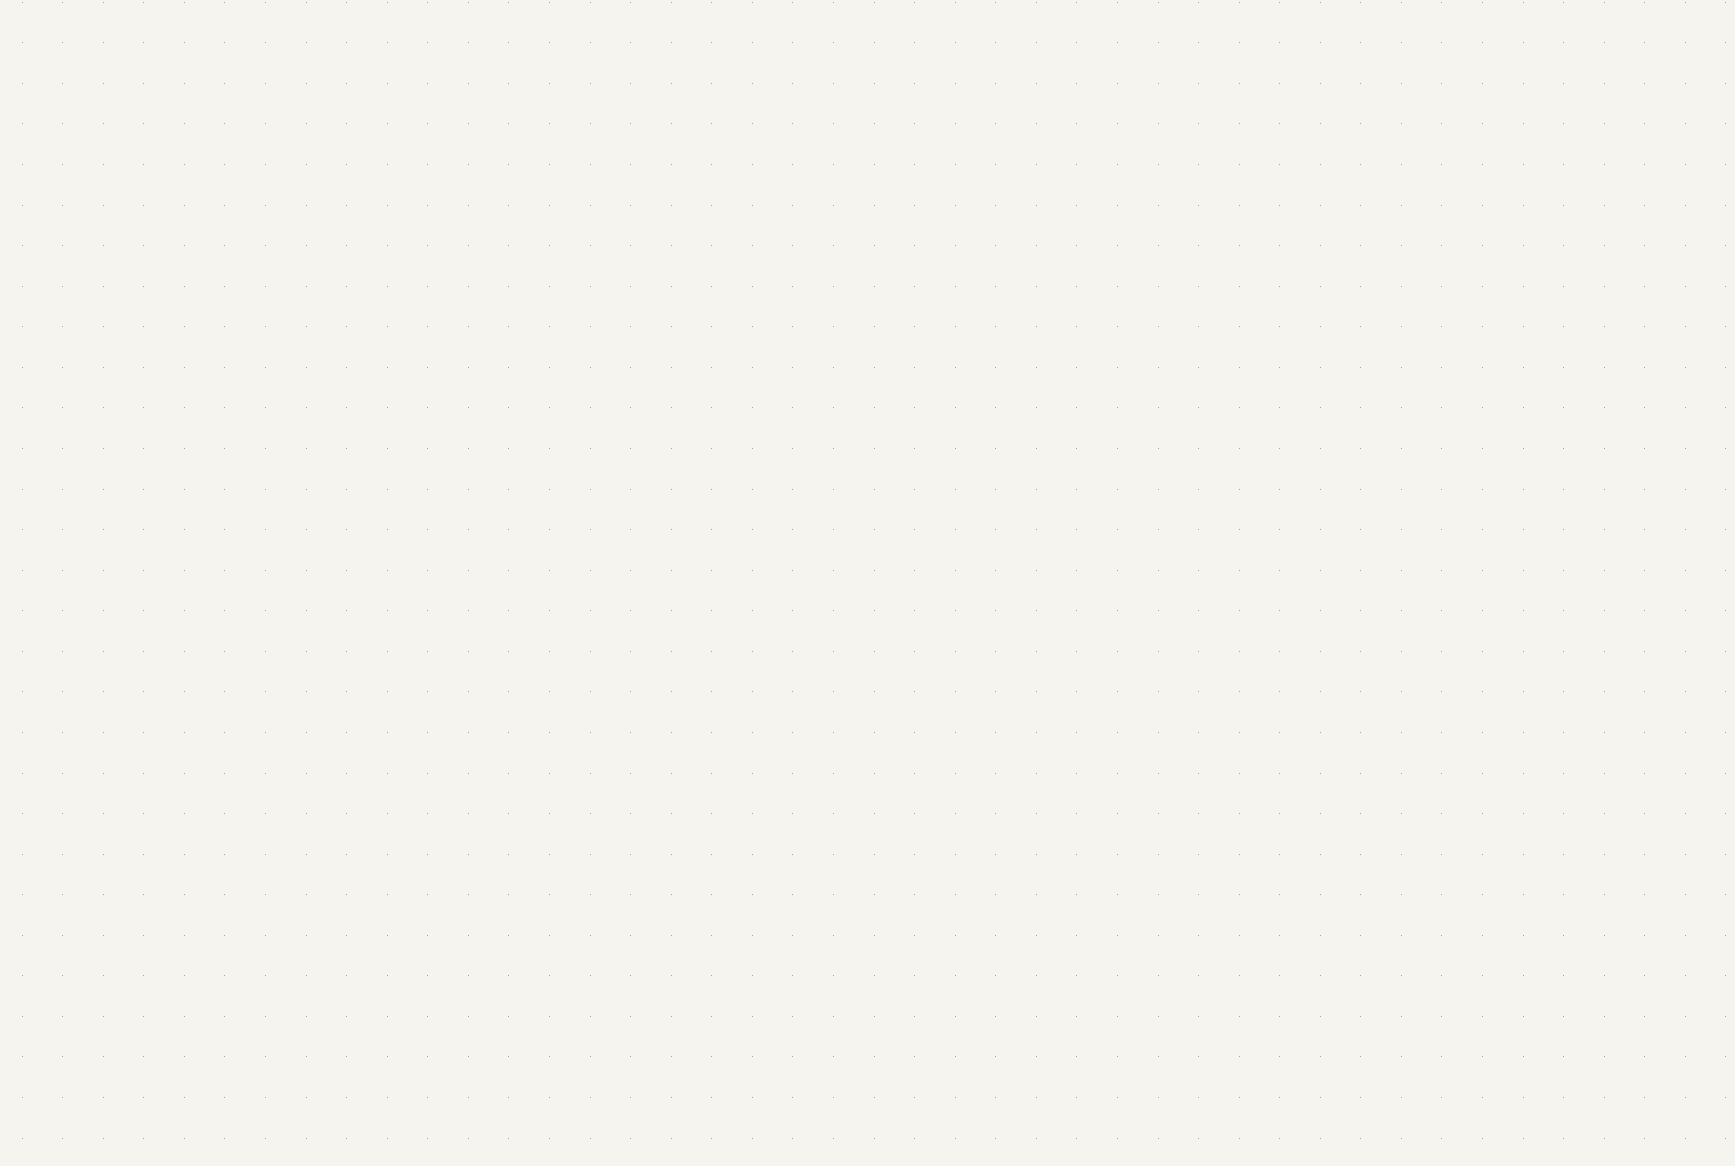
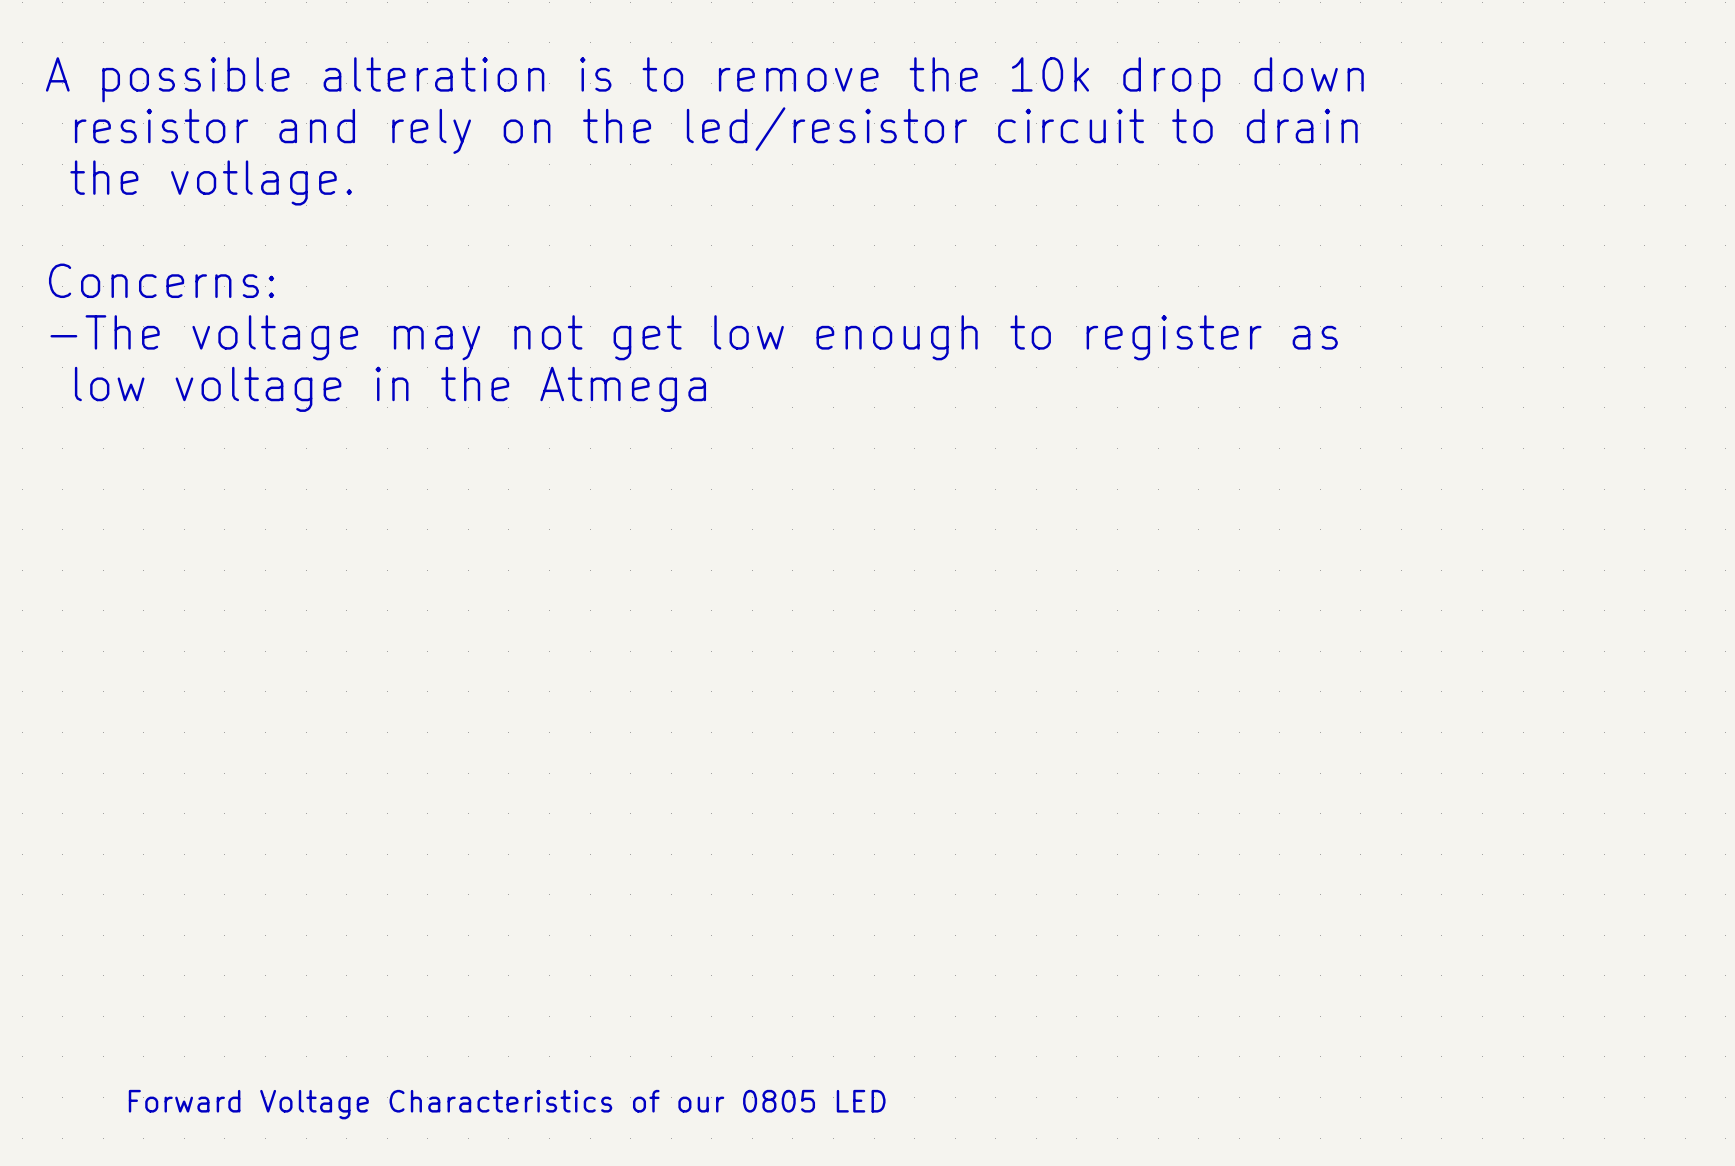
text: none -> A possible alteration is to remove the 10k drop down (704, 79)
text: none -> resistor and rely on the led/resistor circuit to drain (716, 130)
text: none -> the votlage. (211, 182)
text: none -> Concerns: (161, 280)
text: none -> -The voltage may not get low enough to register as (694, 337)
text: none -> low voltage in the Atmega (390, 389)
text: none -> Forward Voltage Characteristics of our 0805 LED (507, 1104)

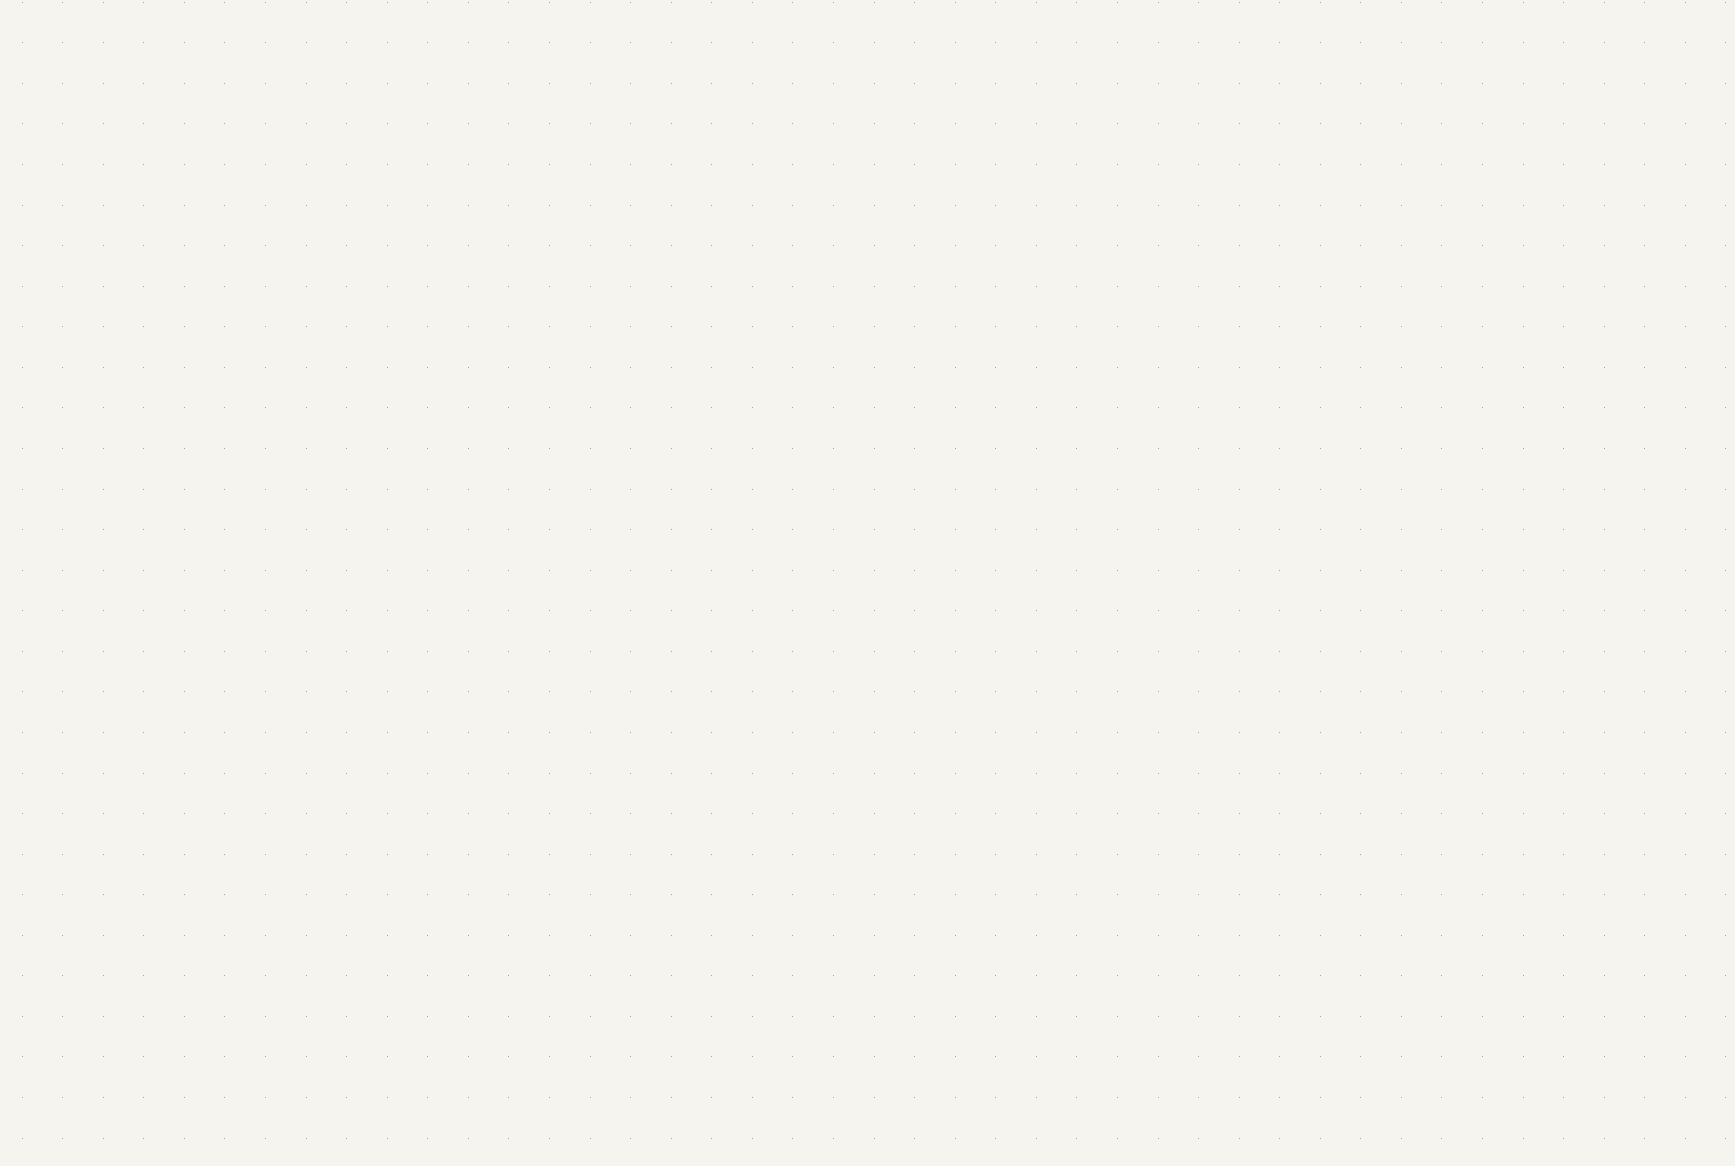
text: A possible alteration is to remove the 10k drop down (704, 79) -> none
text: resistor and rely on the led/resistor circuit to drain (716, 130) -> none
text: the votlage. (211, 182) -> none
text: Concerns: (161, 280) -> none
text: -The voltage may not get low enough to register as (694, 337) -> none
text: low voltage in the Atmega (390, 389) -> none
text: Forward Voltage Characteristics of our 0805 LED (507, 1104) -> none

